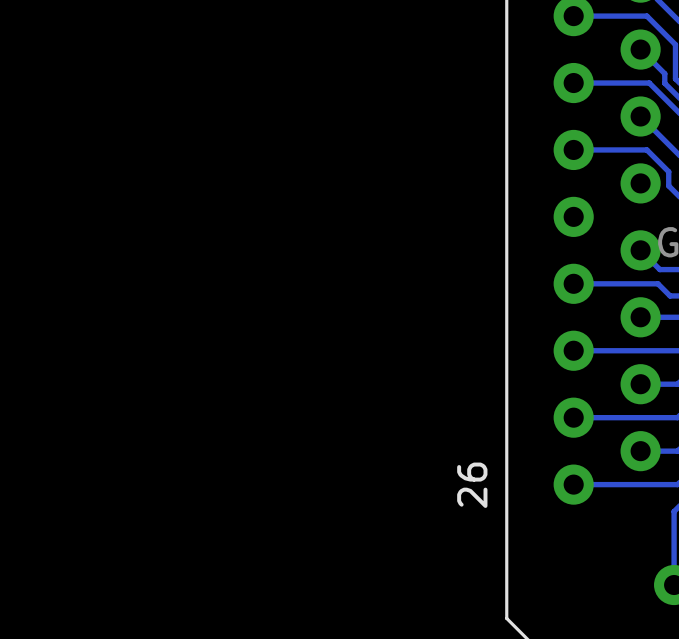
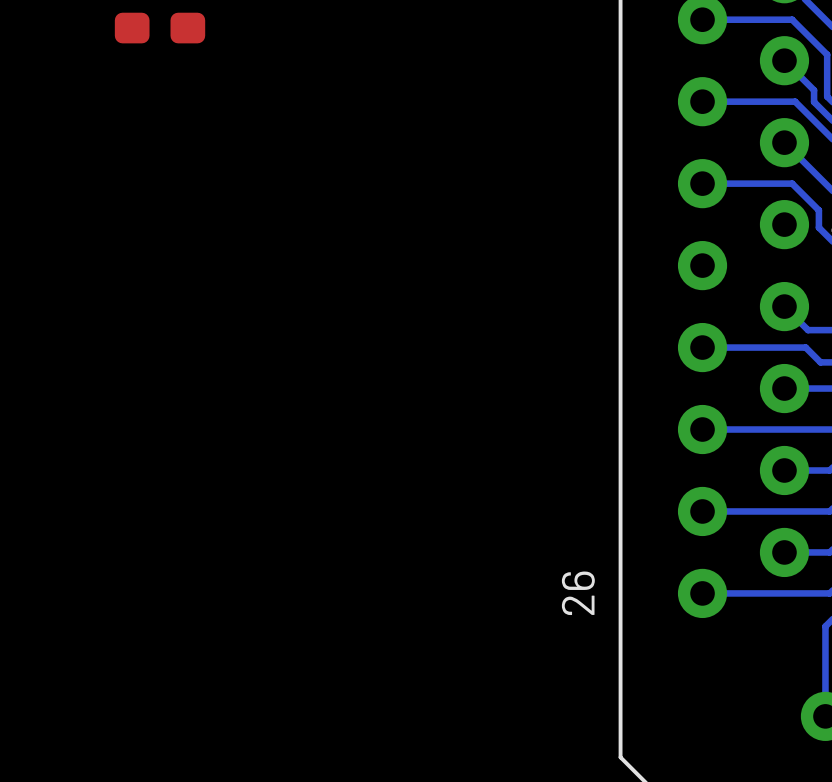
part: none -> (160, 28)

